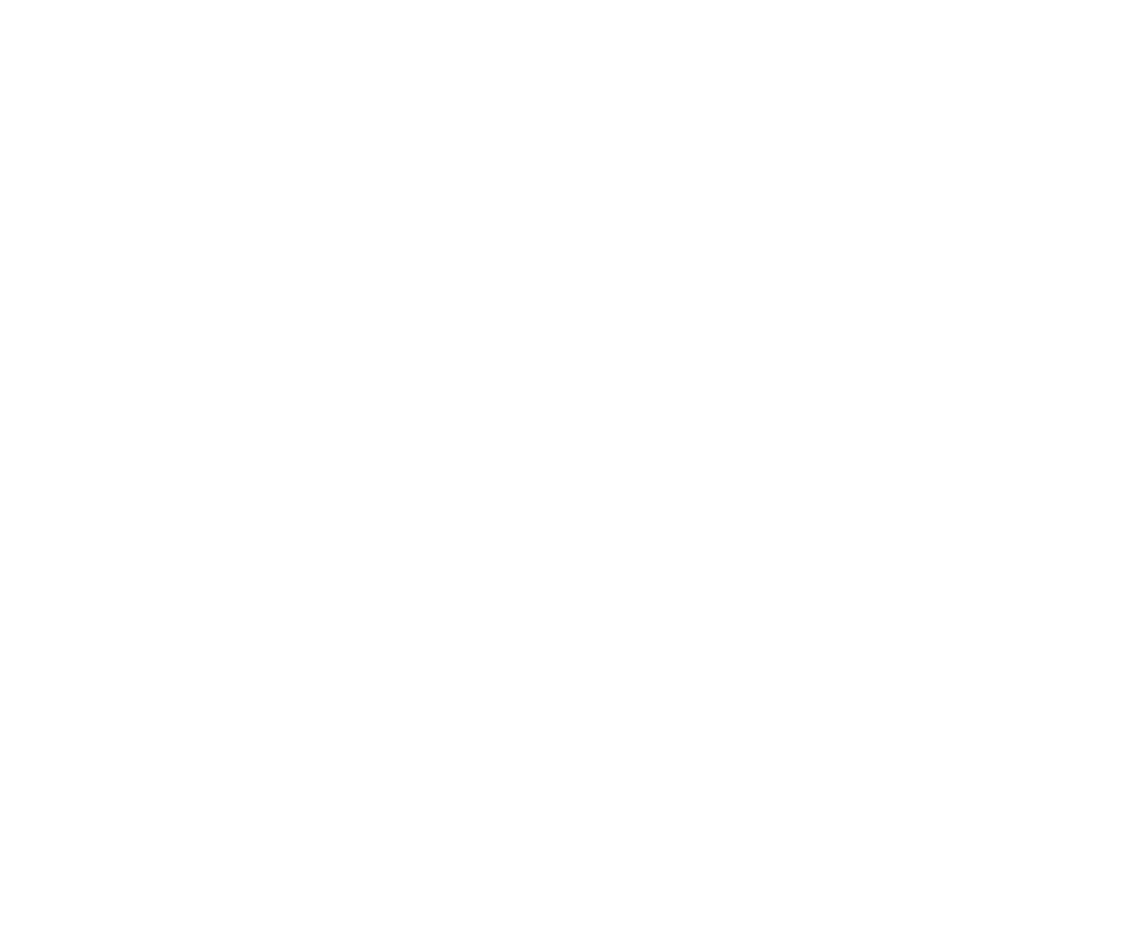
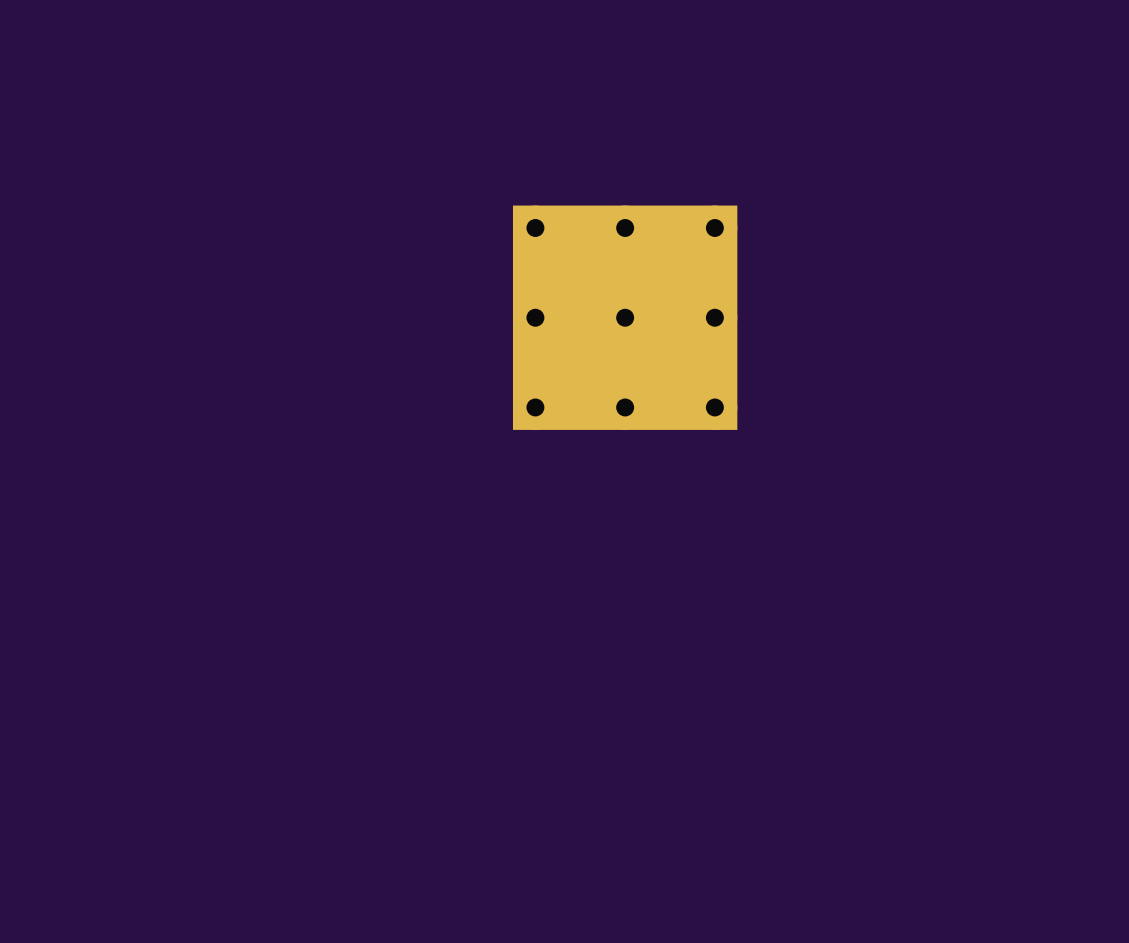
part: none -> (625, 317)

